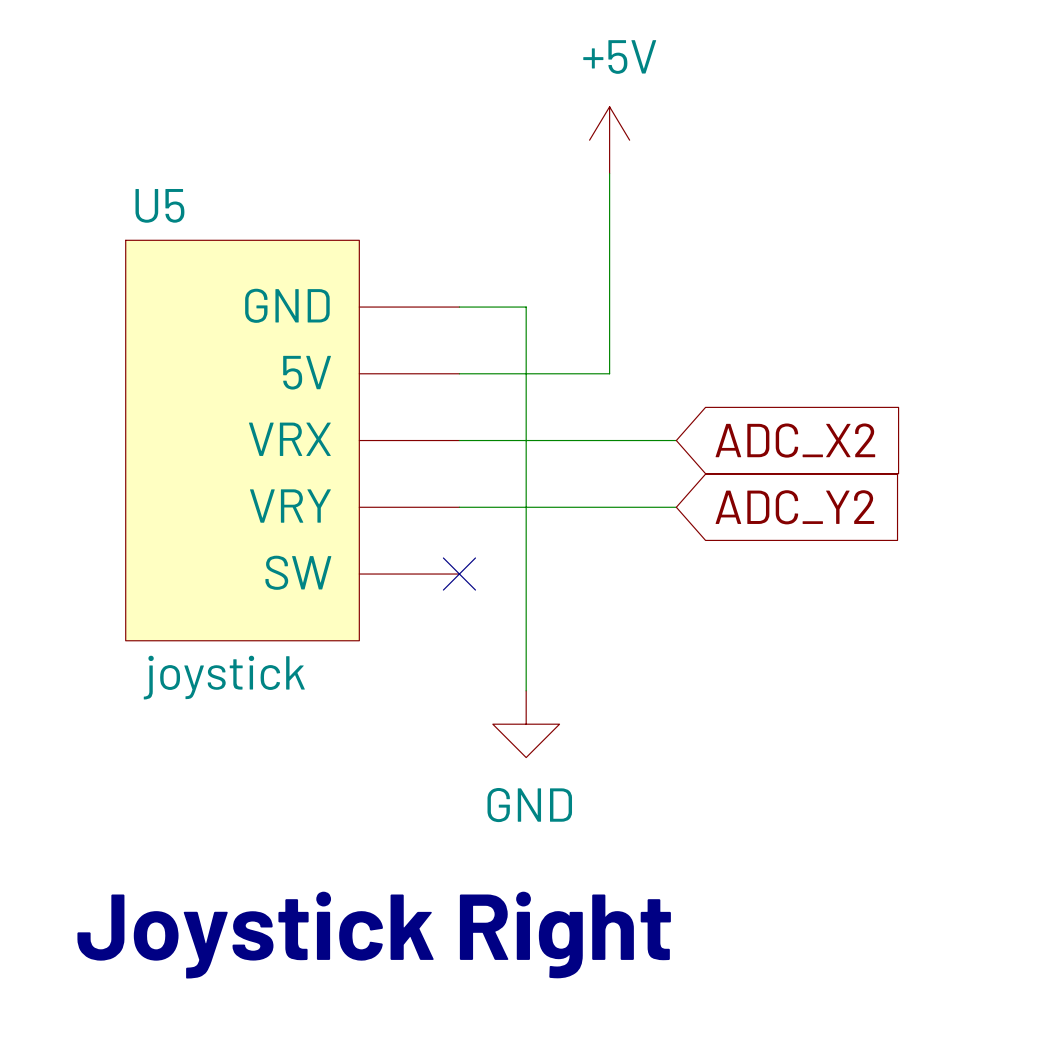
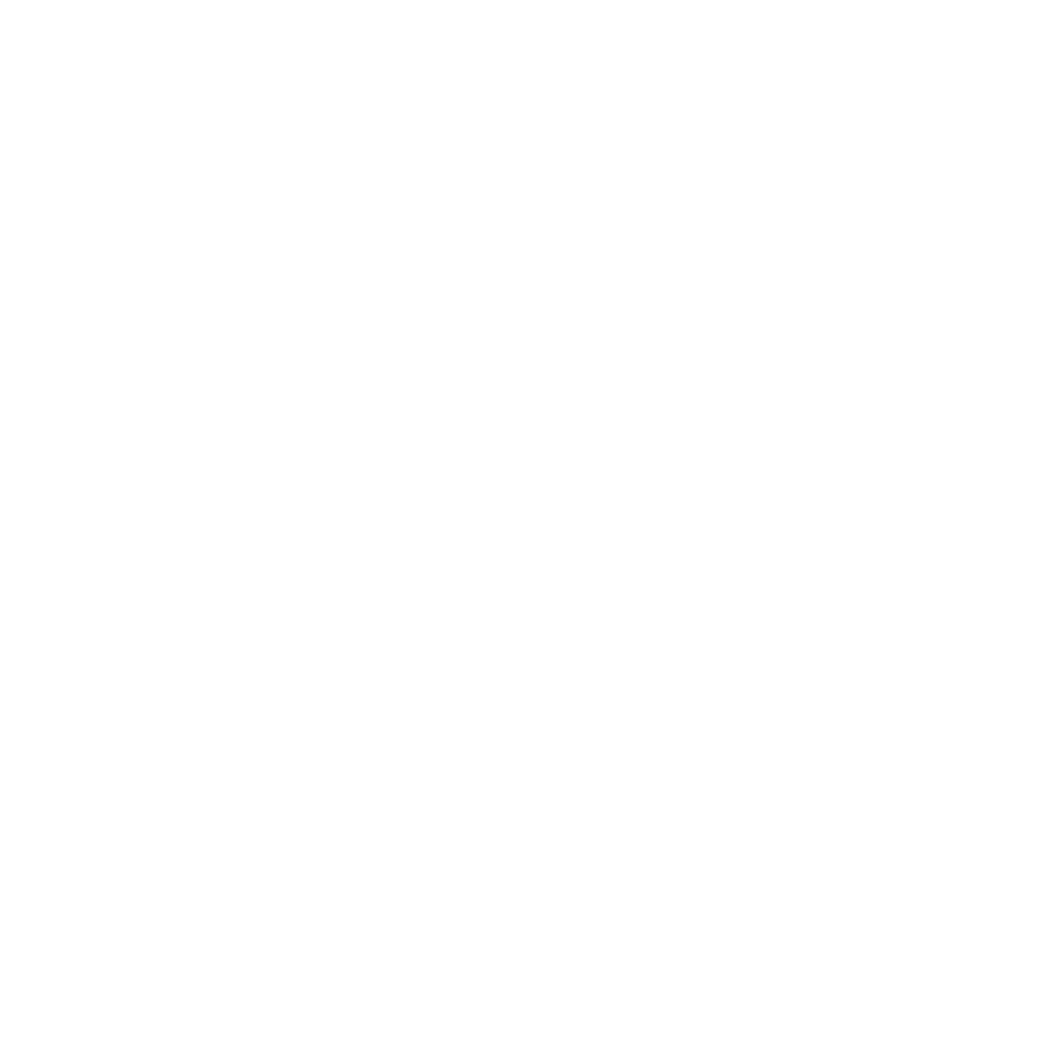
power symbol: +5V (609, 140) -> none
wire: (609, 173) (609, 373) (459, 373) -> none
wire: (459, 307) (526, 307) (526, 690) -> none
U5: joystick (292, 440) -> none
wire: (459, 440) (676, 440) -> none
global label: ADC_X2 (795, 440) -> none
wire: (459, 507) (676, 507) -> none
global label: ADC_Y2 (794, 507) -> none
no-connect mark: (459, 574) -> none
power symbol: GND (526, 724) -> none
text: Joystick Right (374, 935) -> none

